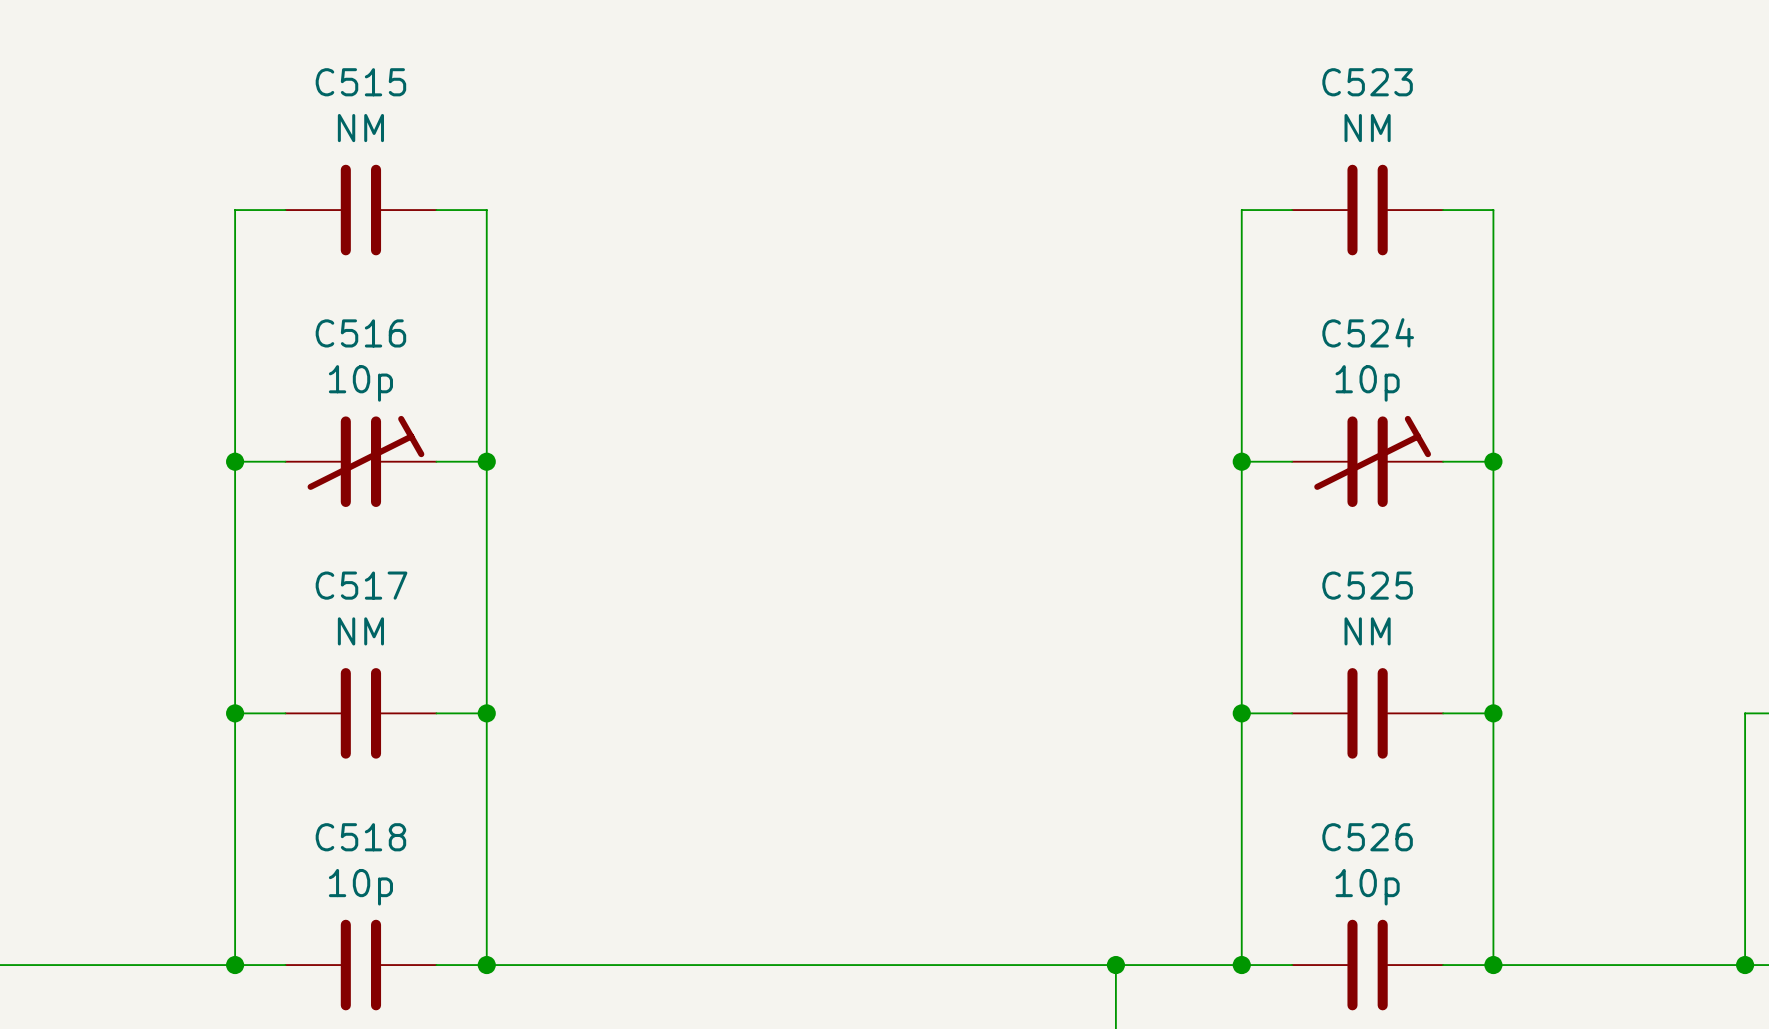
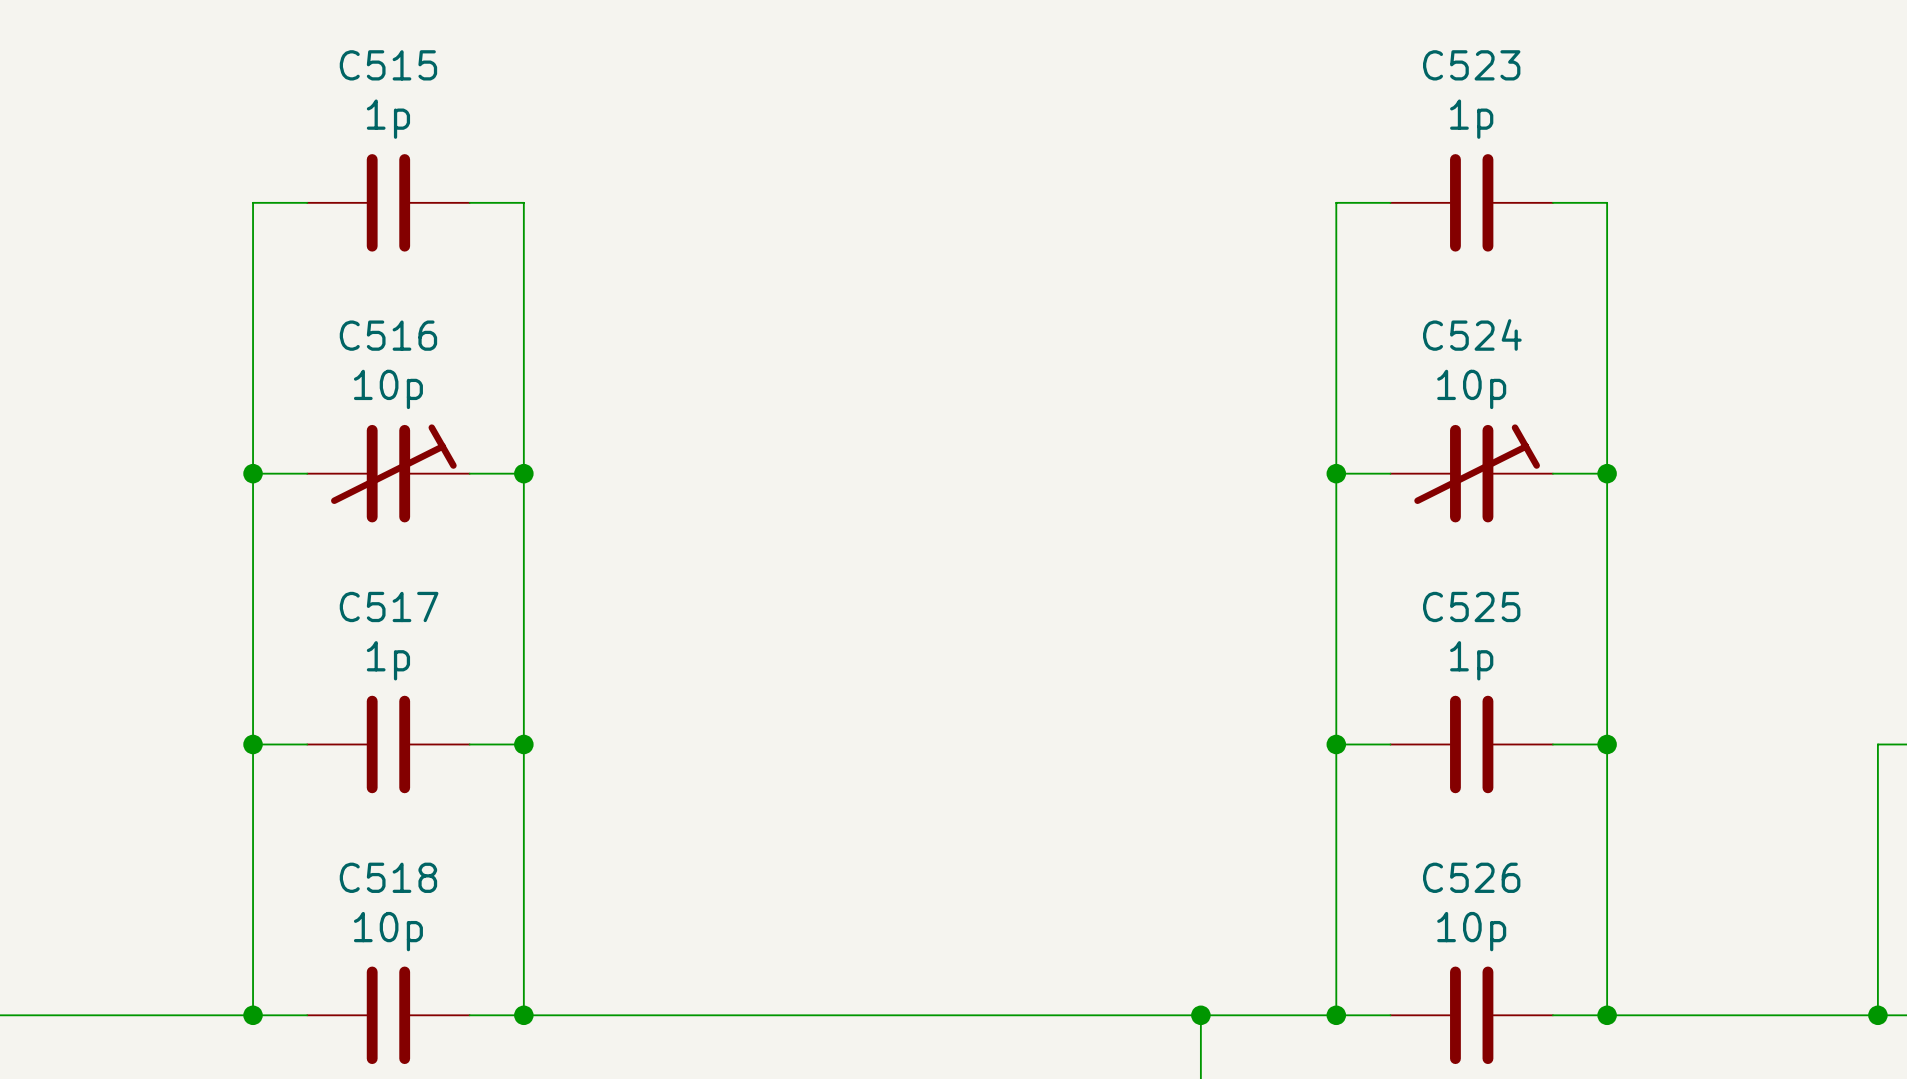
C515 value: NM (360, 128) -> 1p (388, 119)
C523 value: NM (1367, 128) -> 1p (1471, 119)
C517 value: NM (360, 631) -> 1p (388, 660)
C525 value: NM (1367, 631) -> 1p (1471, 660)

